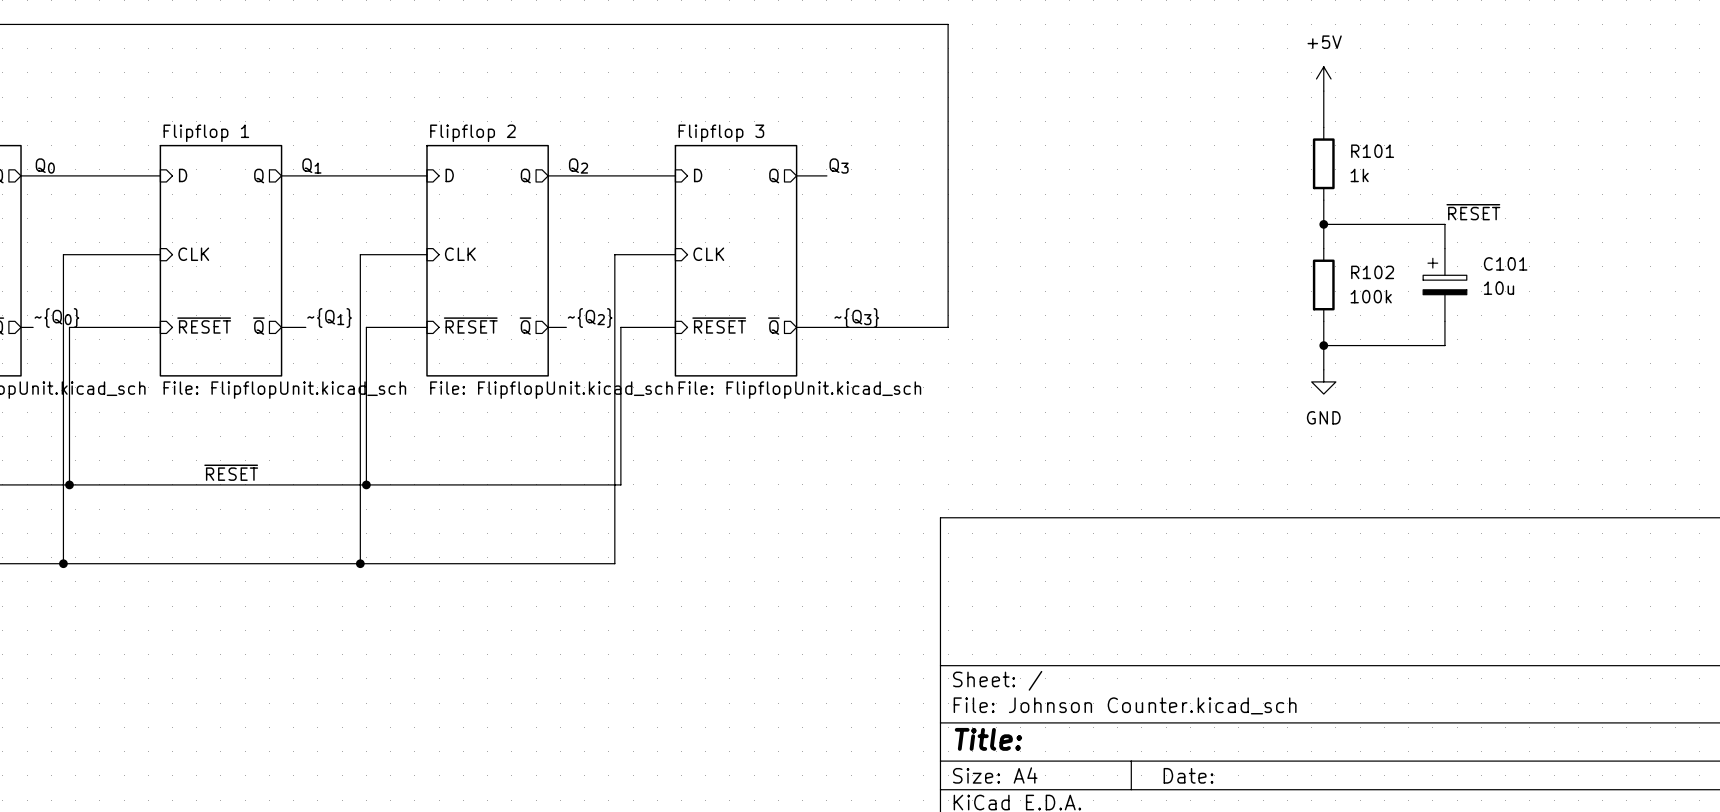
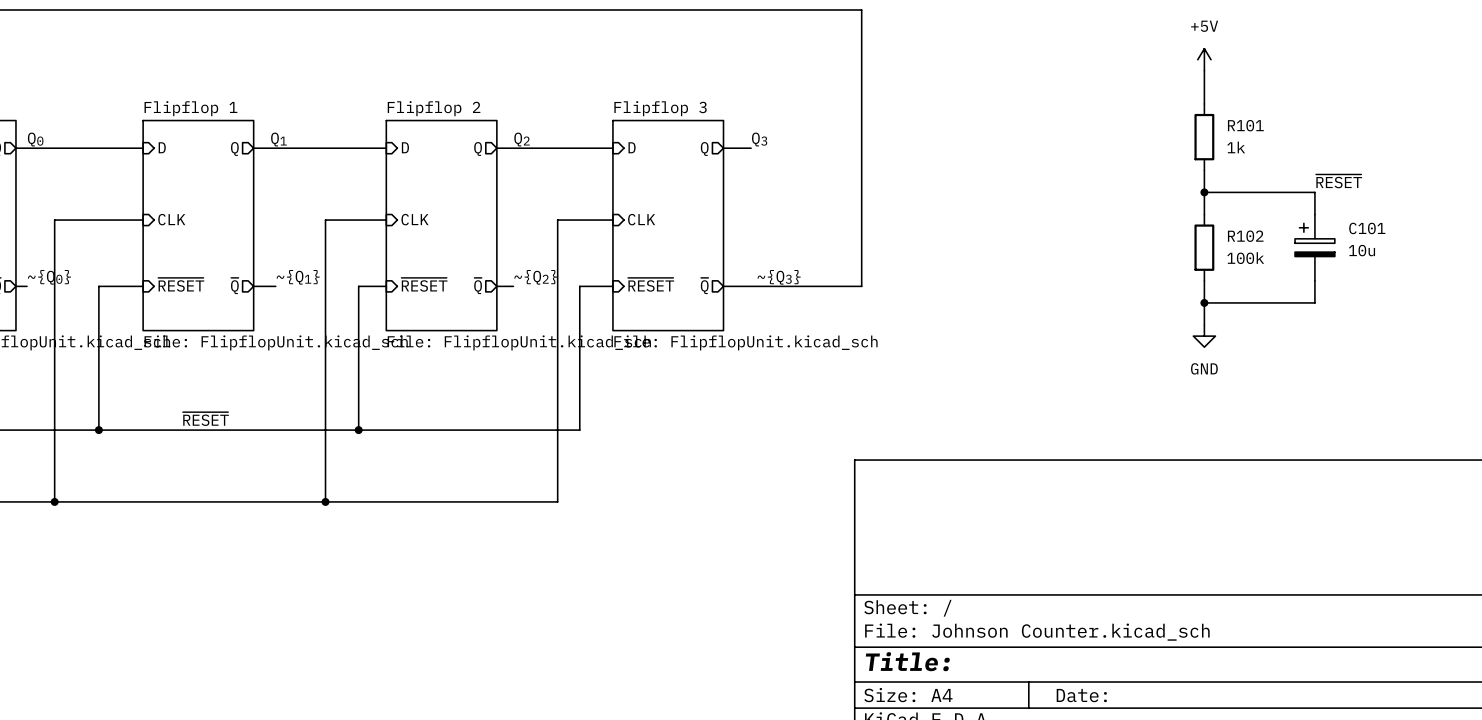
wire: (111, 327) (69, 327) (69, 484) -> (98, 286) (98, 430)
wire: (396, 327) (366, 327) (366, 484) -> (358, 286) (358, 430)
wire: (639, 327) (620, 327) (620, 484) -> (579, 286) (579, 430) (563, 430)
junction position: (69, 484) -> (98, 430)
junction position: (366, 484) -> (358, 430)

